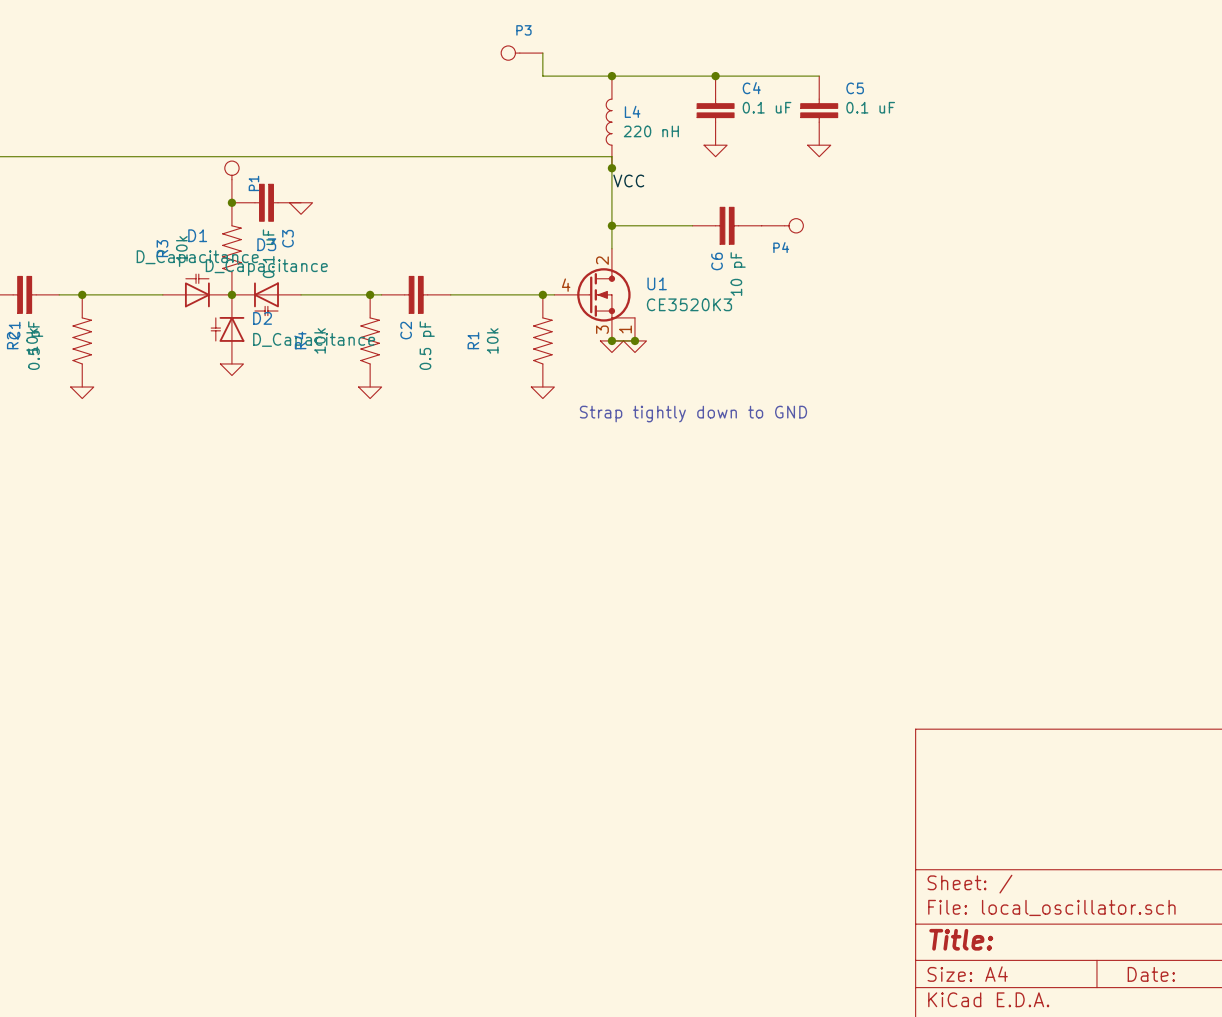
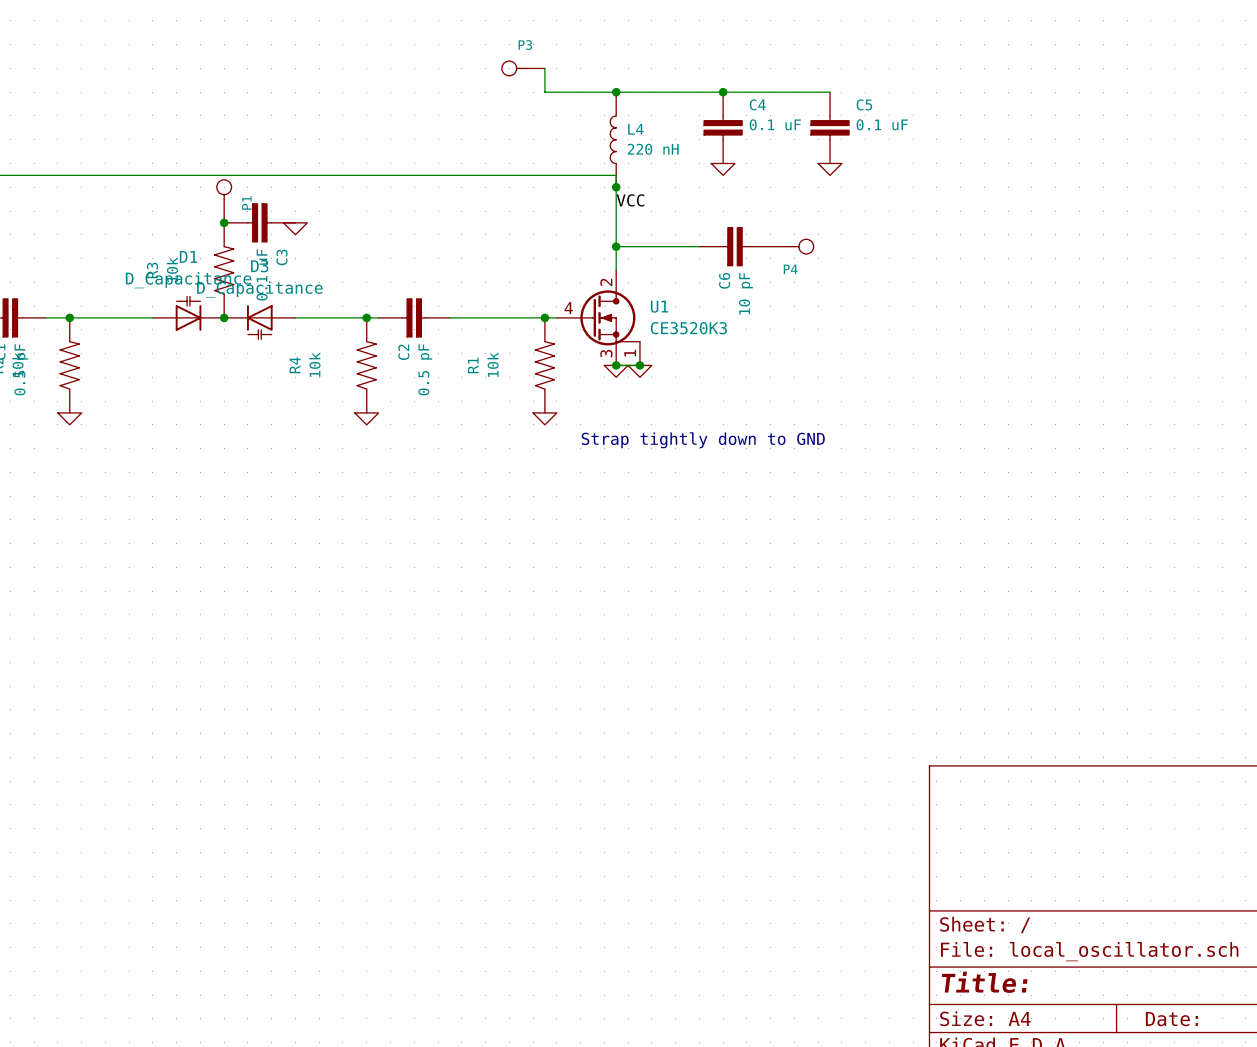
D2: D_Capacitance (227, 329) -> none
power symbol: (231, 369) -> none

